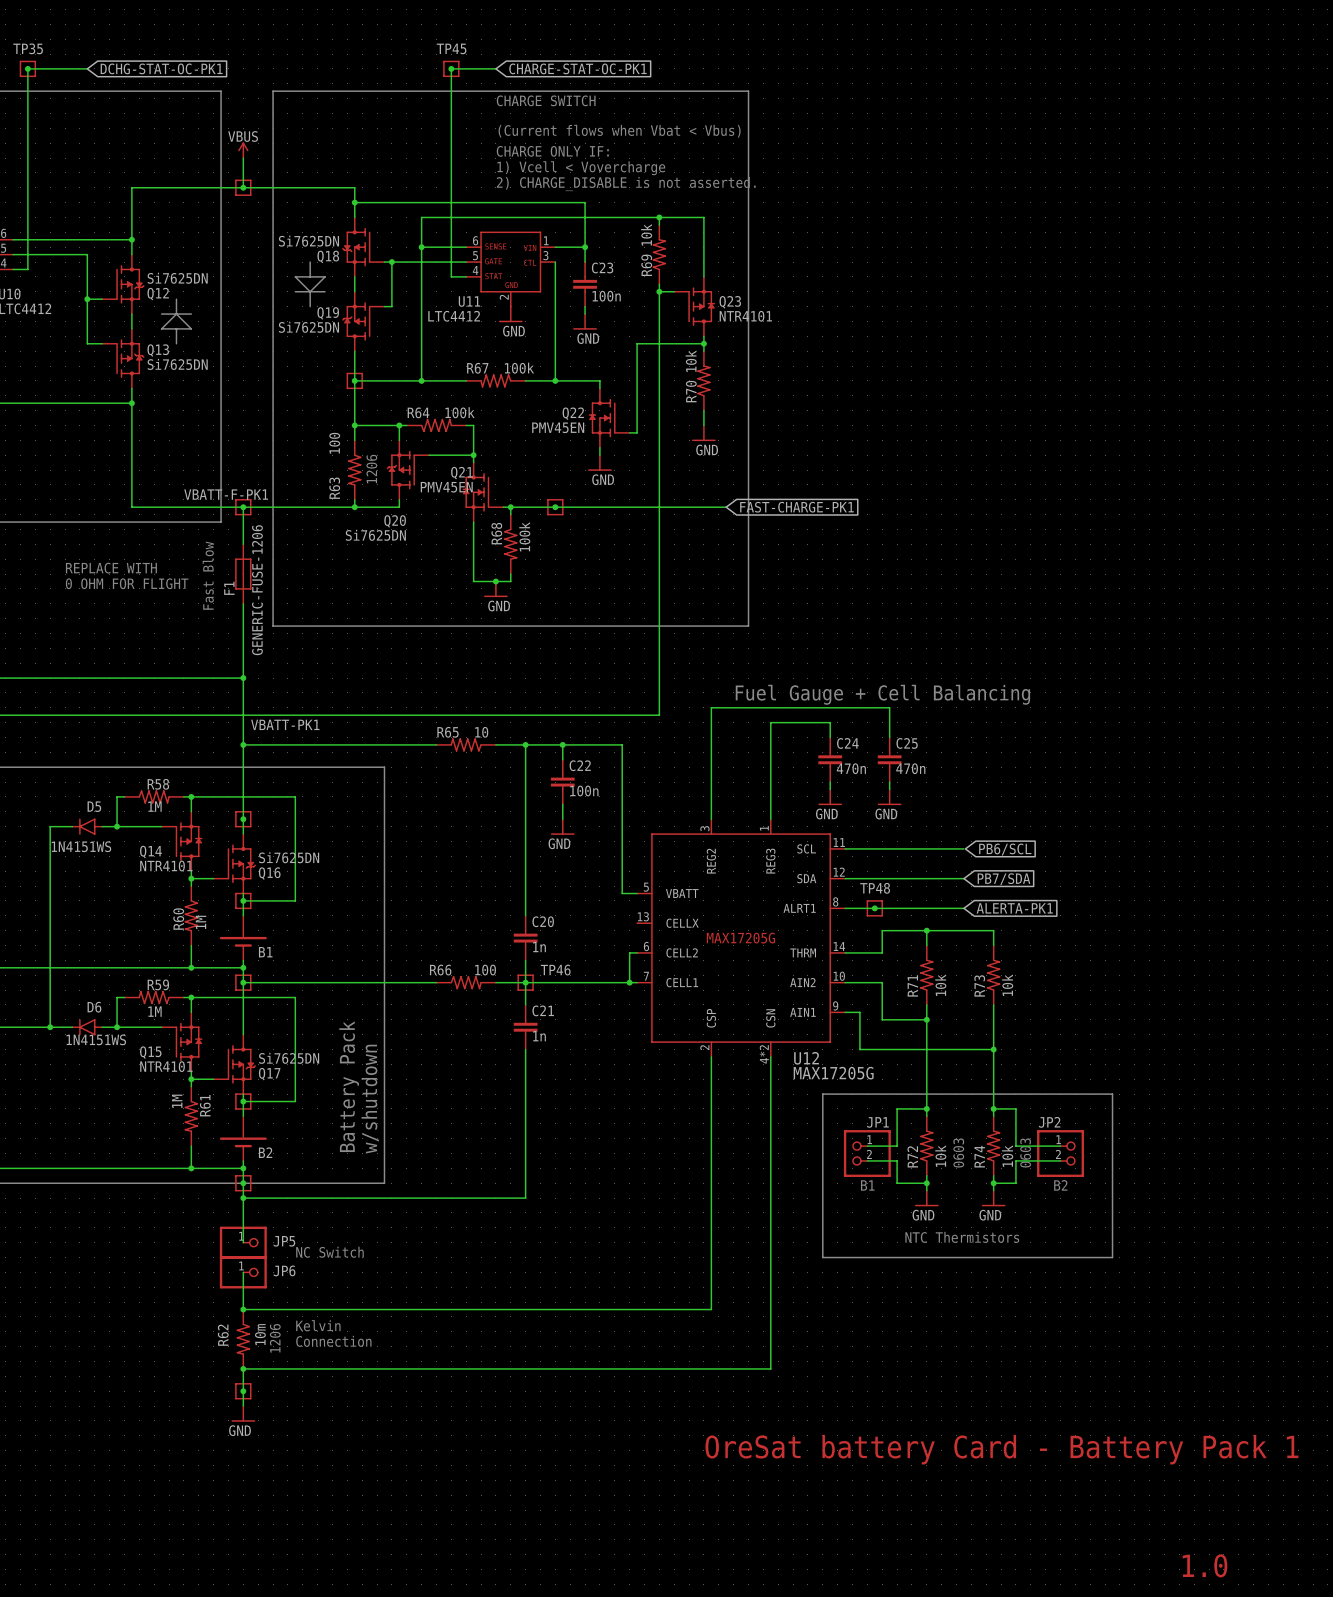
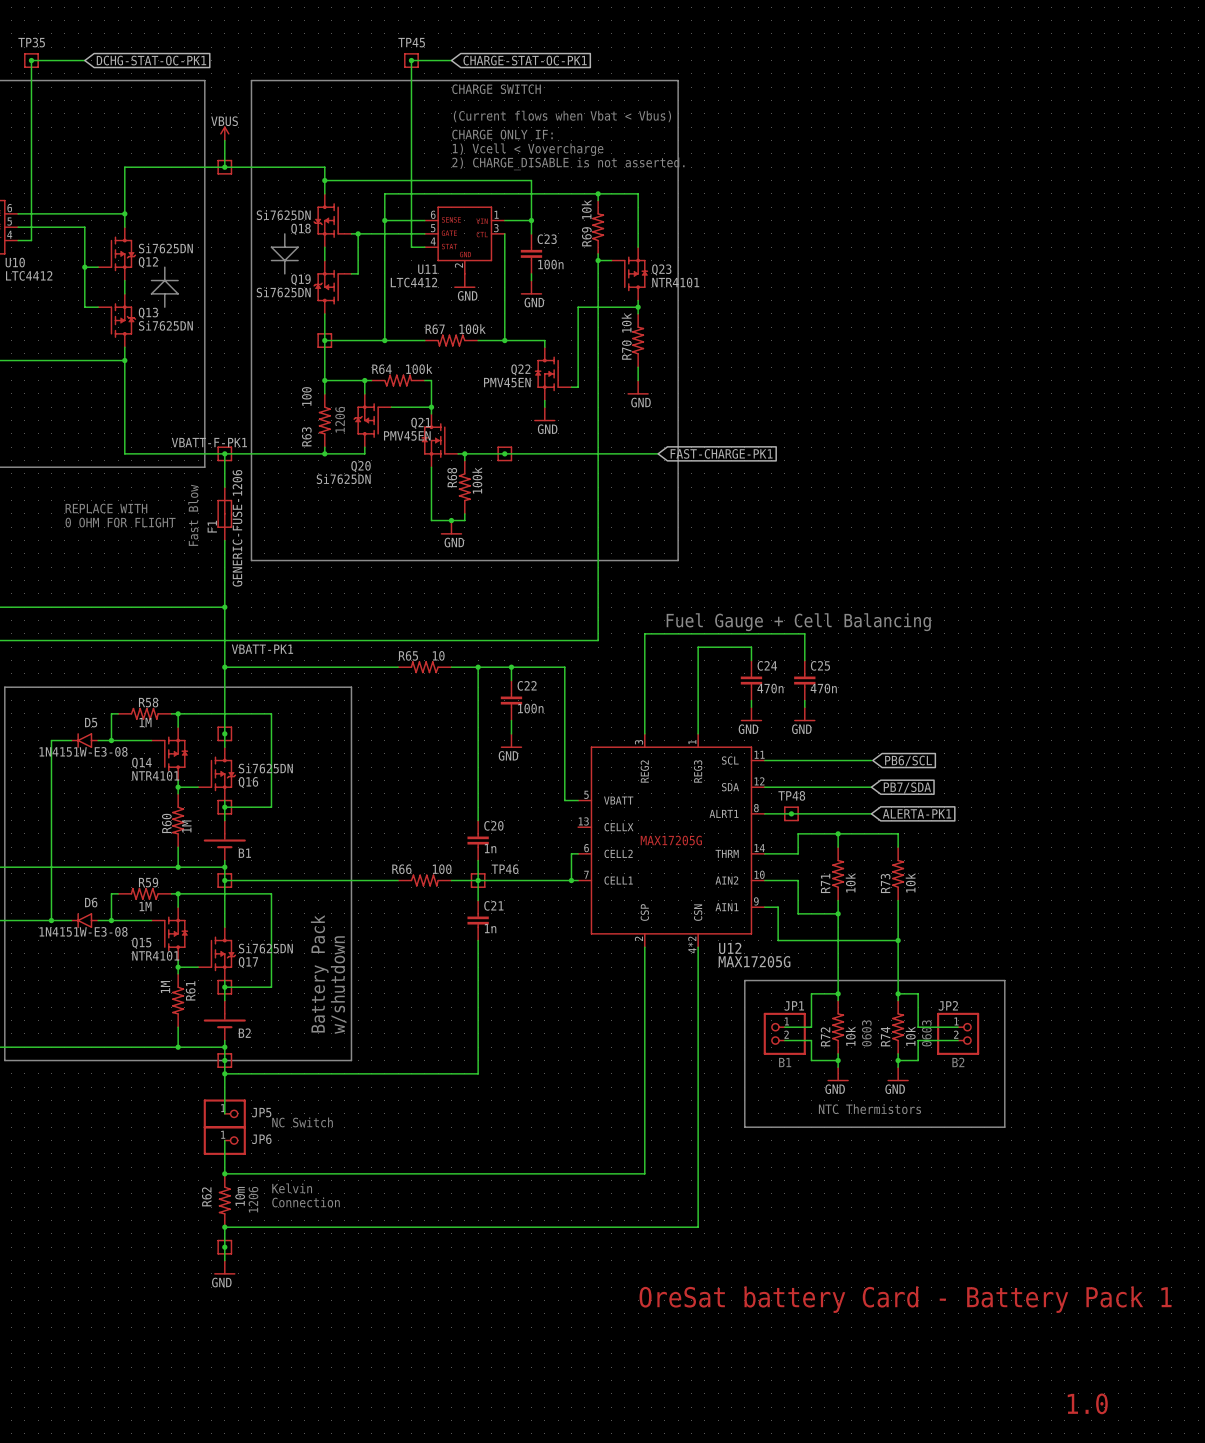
D5 value: 1N4151WS (81, 846) -> 1N4151W-E3-08 (83, 751)
D6 value: 1N4151WS (96, 1039) -> 1N4151W-E3-08 (83, 931)

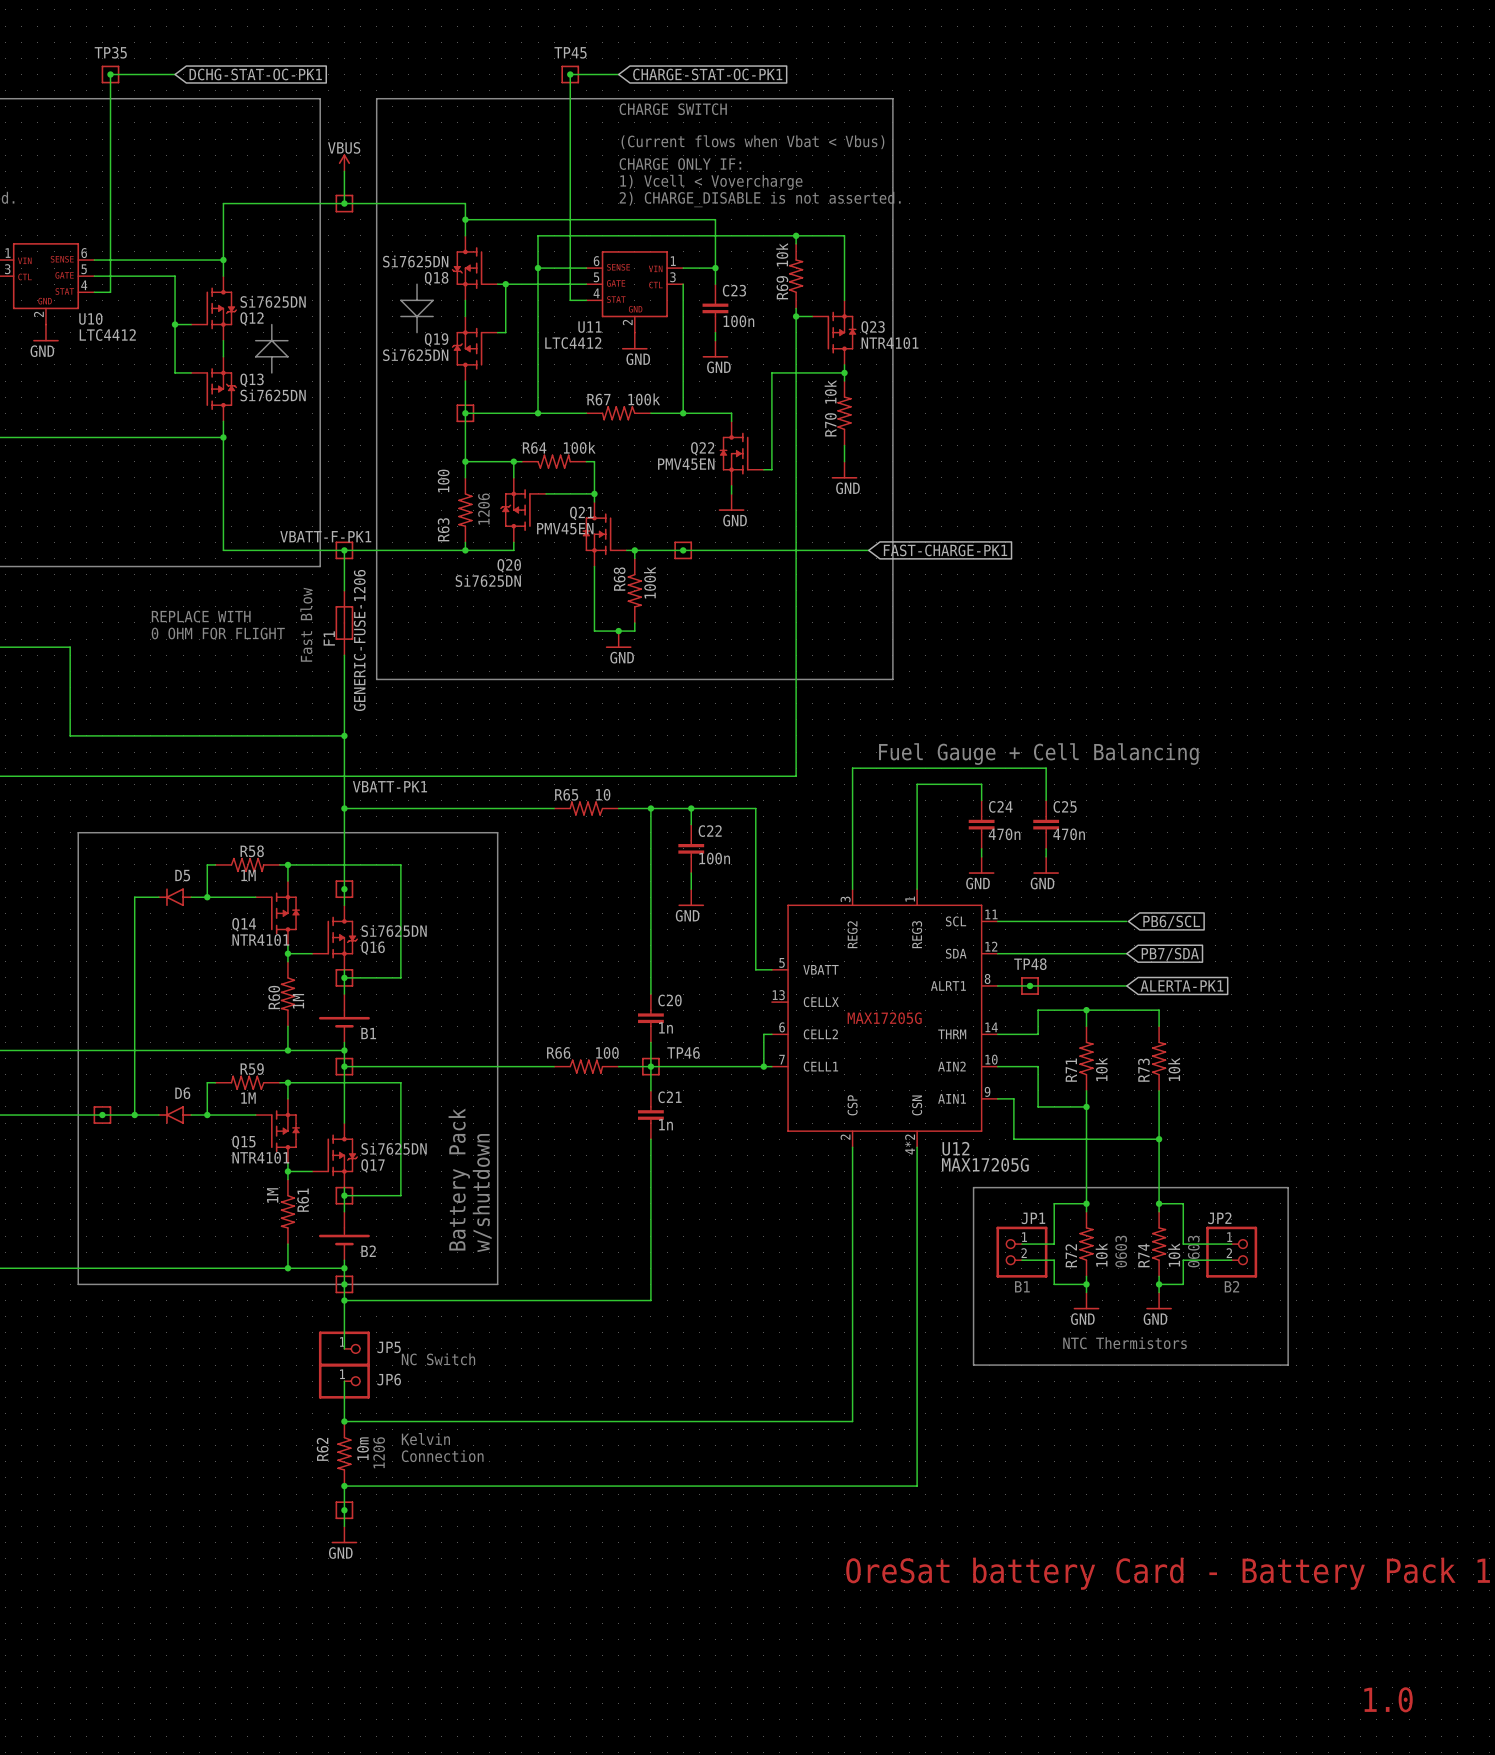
D5 value: 1N4151W-E3-08 (83, 751) -> none
part: none -> (102, 1115)
junction: none -> (102, 1115)
D6 value: 1N4151W-E3-08 (83, 931) -> none

